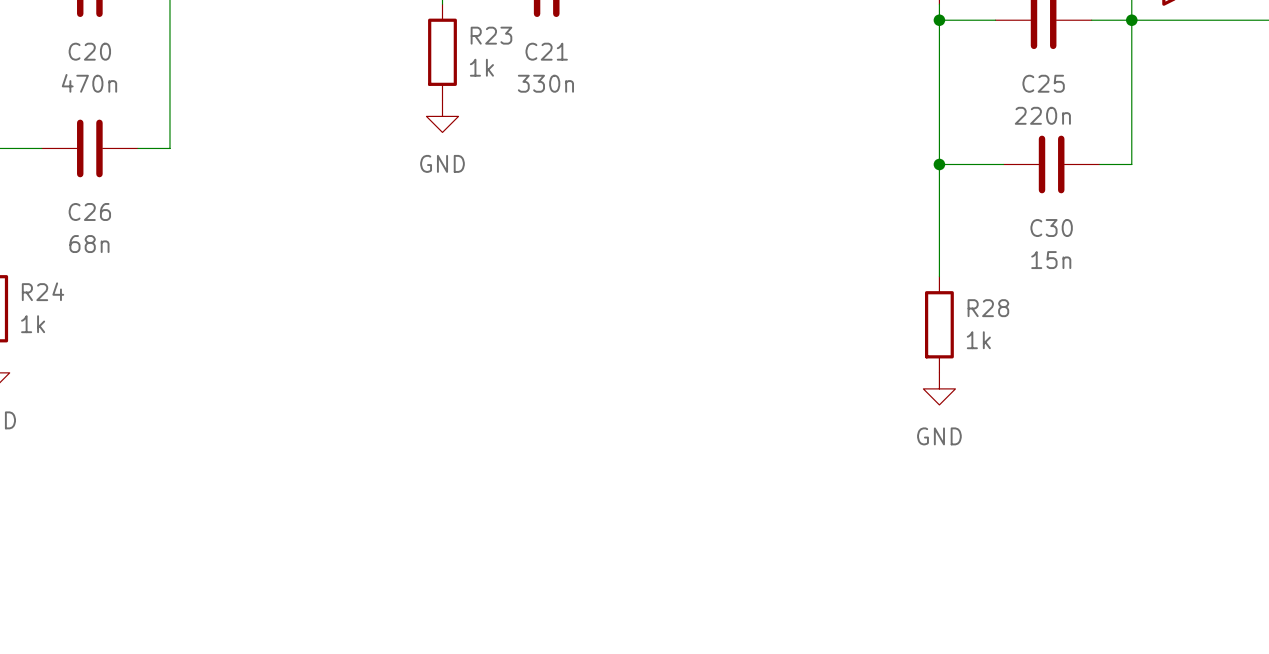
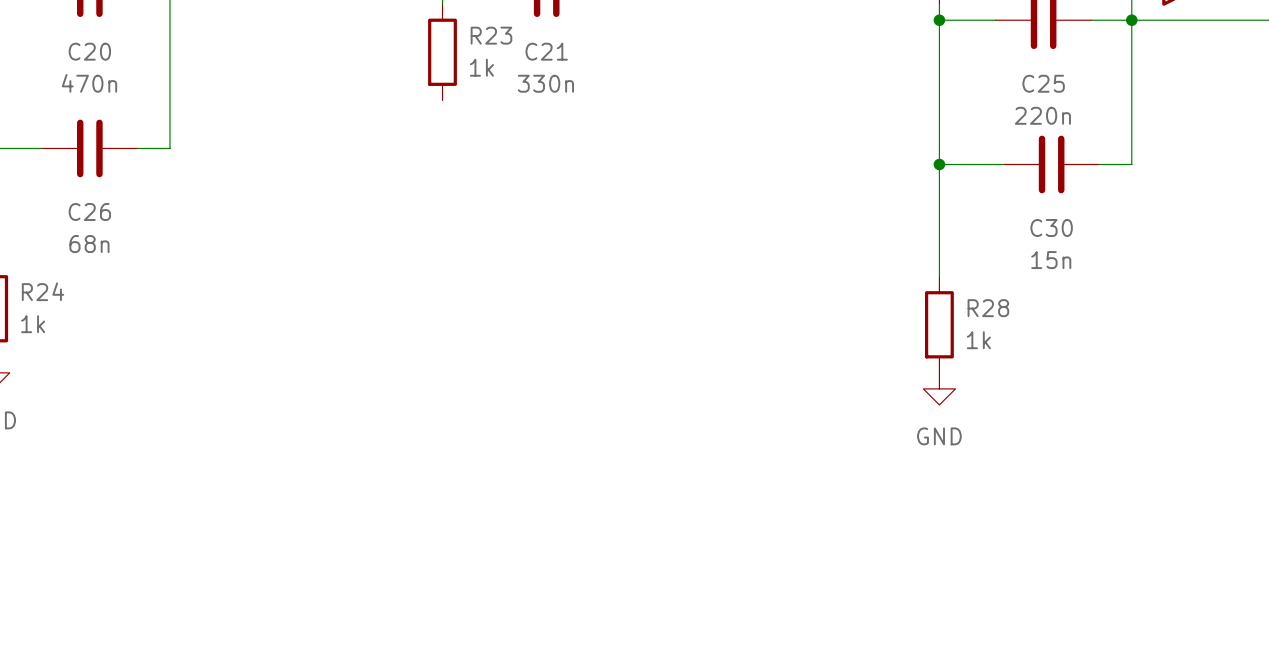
power symbol: GND (442, 116) -> none

